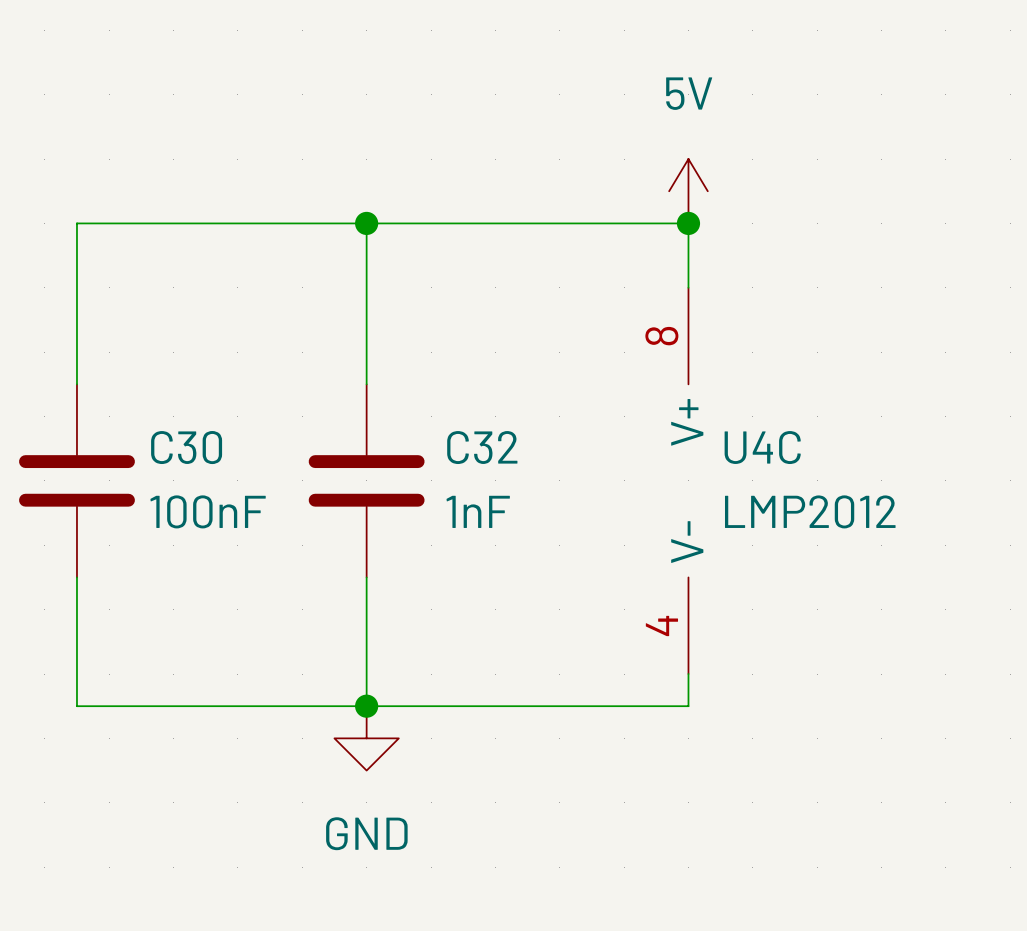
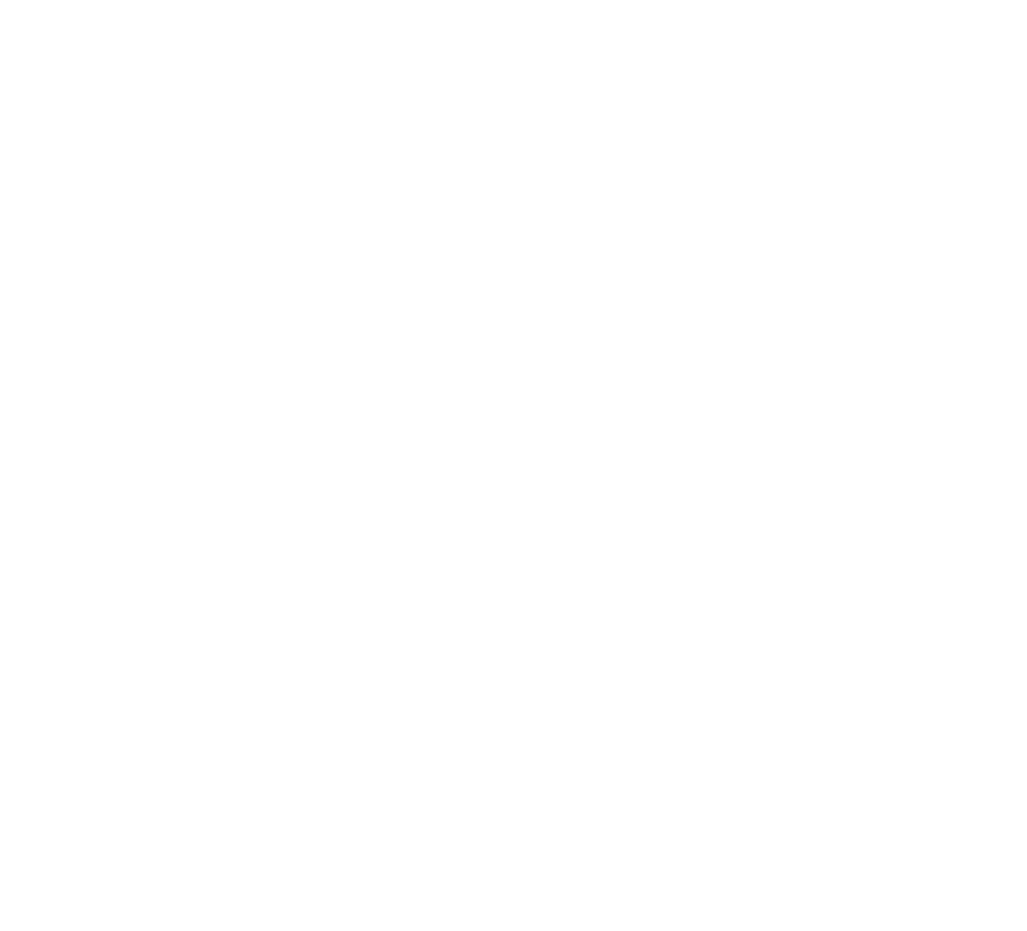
power symbol: 5V (688, 191) -> none
wire: (366, 223) (366, 384) -> none
junction: (366, 223) -> none
junction: (688, 223) -> none
wire: (688, 287) (688, 223) (76, 223) (76, 384) -> none
C30: 100nF (76, 480) -> none
C32: 1nF (366, 480) -> none
U4C: LMP2012 (688, 480) -> none
wire: (76, 577) (76, 706) (688, 706) (688, 674) -> none
wire: (366, 577) (366, 706) -> none
junction: (366, 706) -> none
power symbol: GND (366, 738) -> none

